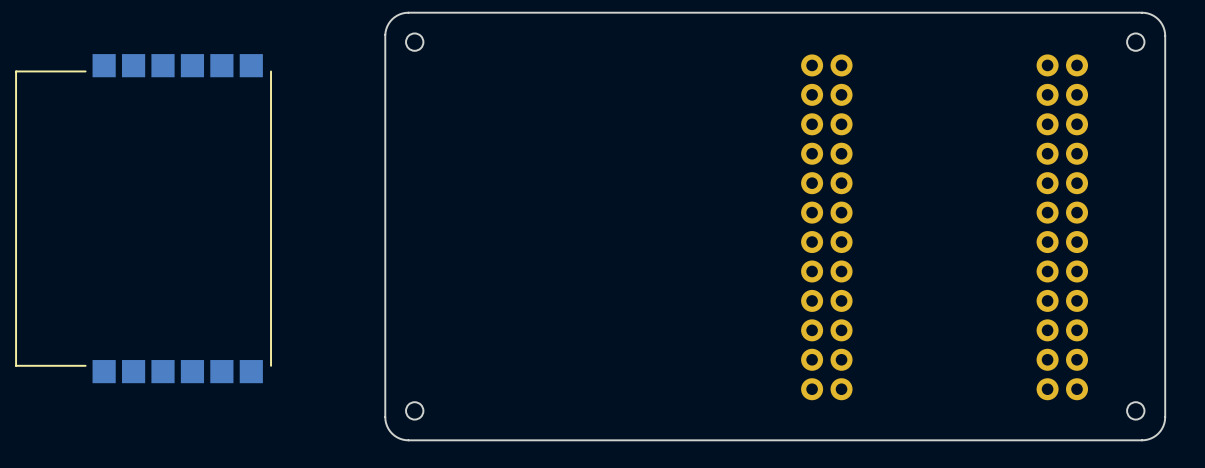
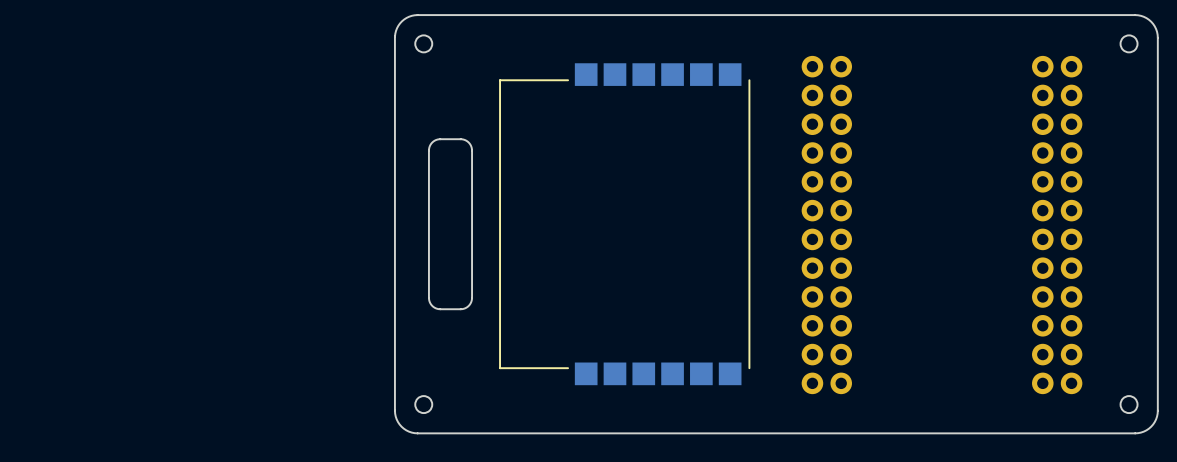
board edge: none -> (460, 139) (437, 139) (431, 143) (429, 149) (428, 297) (431, 304) (438, 309) (463, 308) (469, 304) (471, 299) (471, 149) (468, 142) (460, 139)
part: (143, 218) -> none
part: none -> (624, 224)

